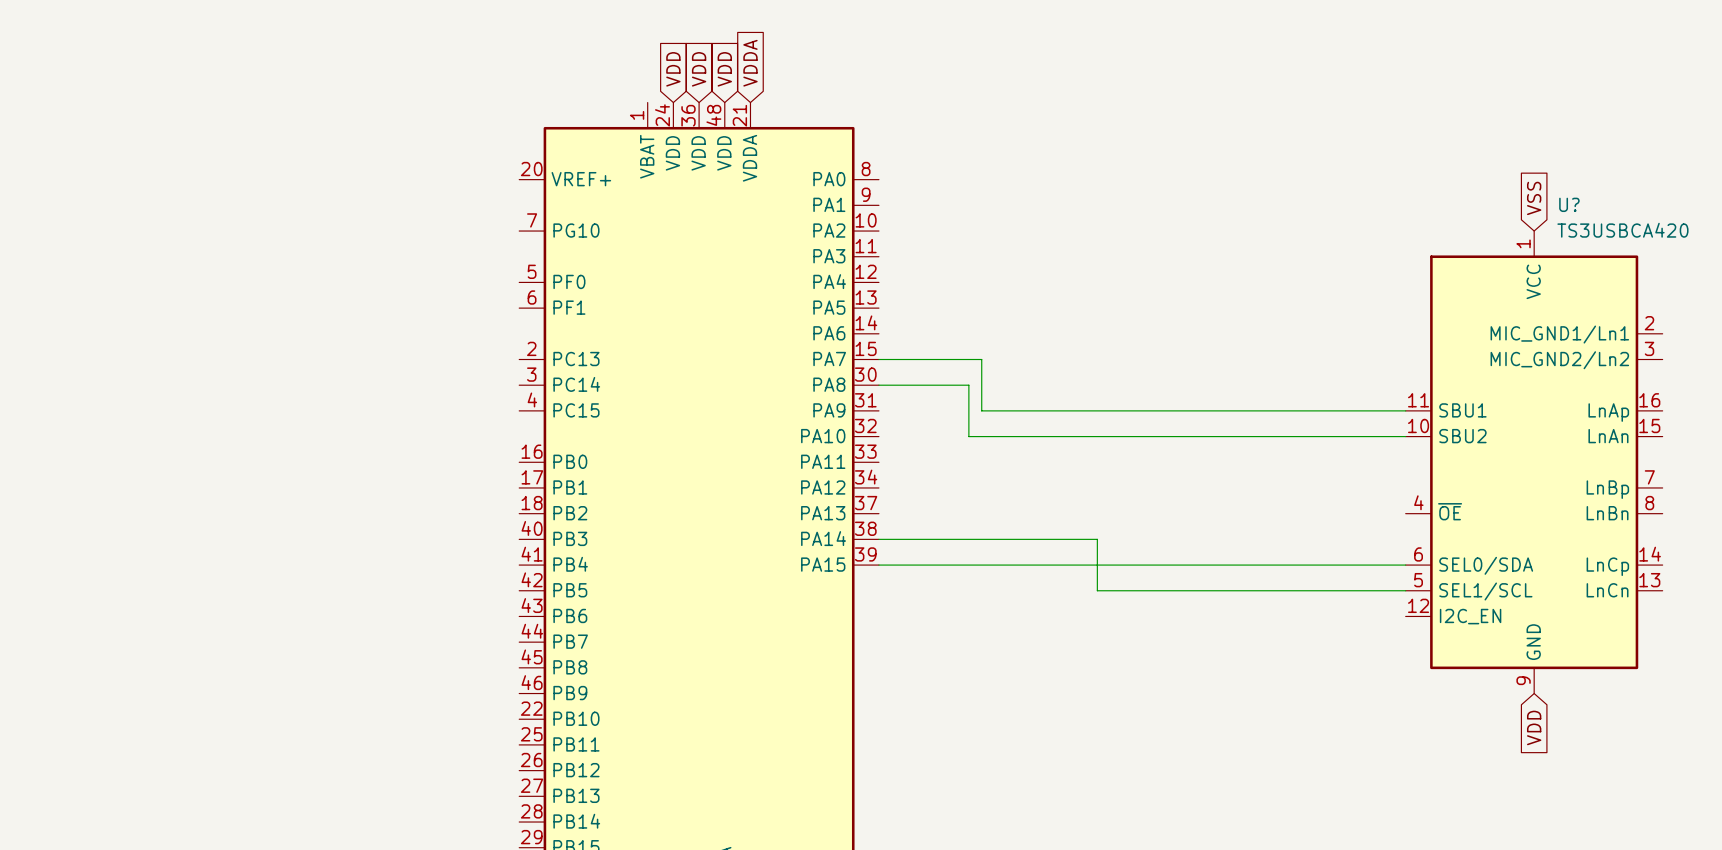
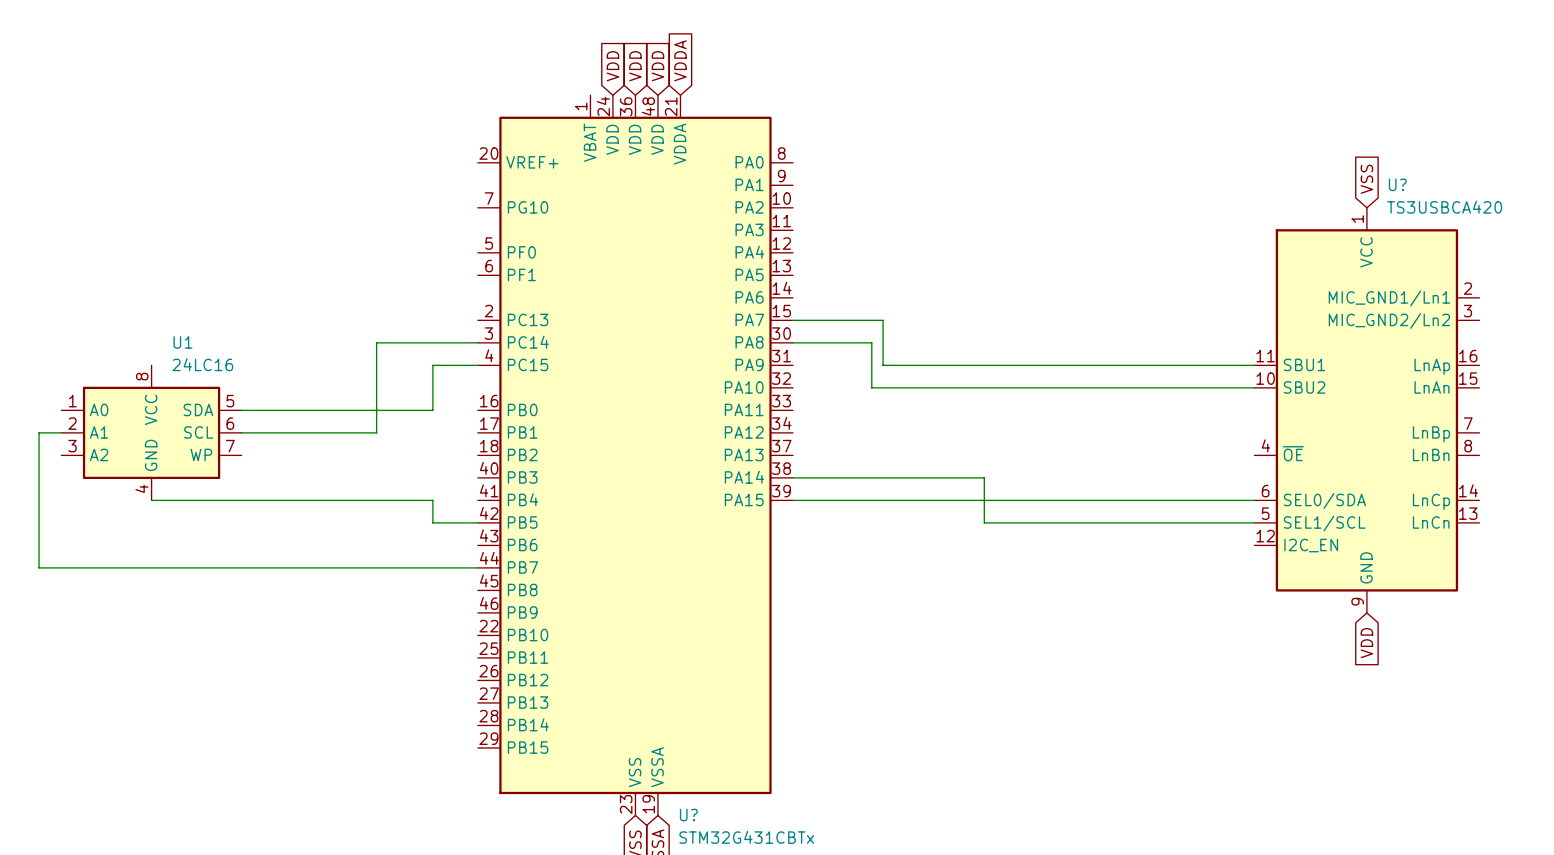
wire: none -> (477, 342) (376, 342) (376, 432) (241, 432)
wire: none -> (477, 365) (432, 365) (432, 410) (241, 410)
wire: none -> (61, 432) (39, 432) (39, 567) (477, 567)
U1: none -> 24LC16 (151, 432)
wire: none -> (151, 500) (432, 500) (432, 522) (477, 522)

